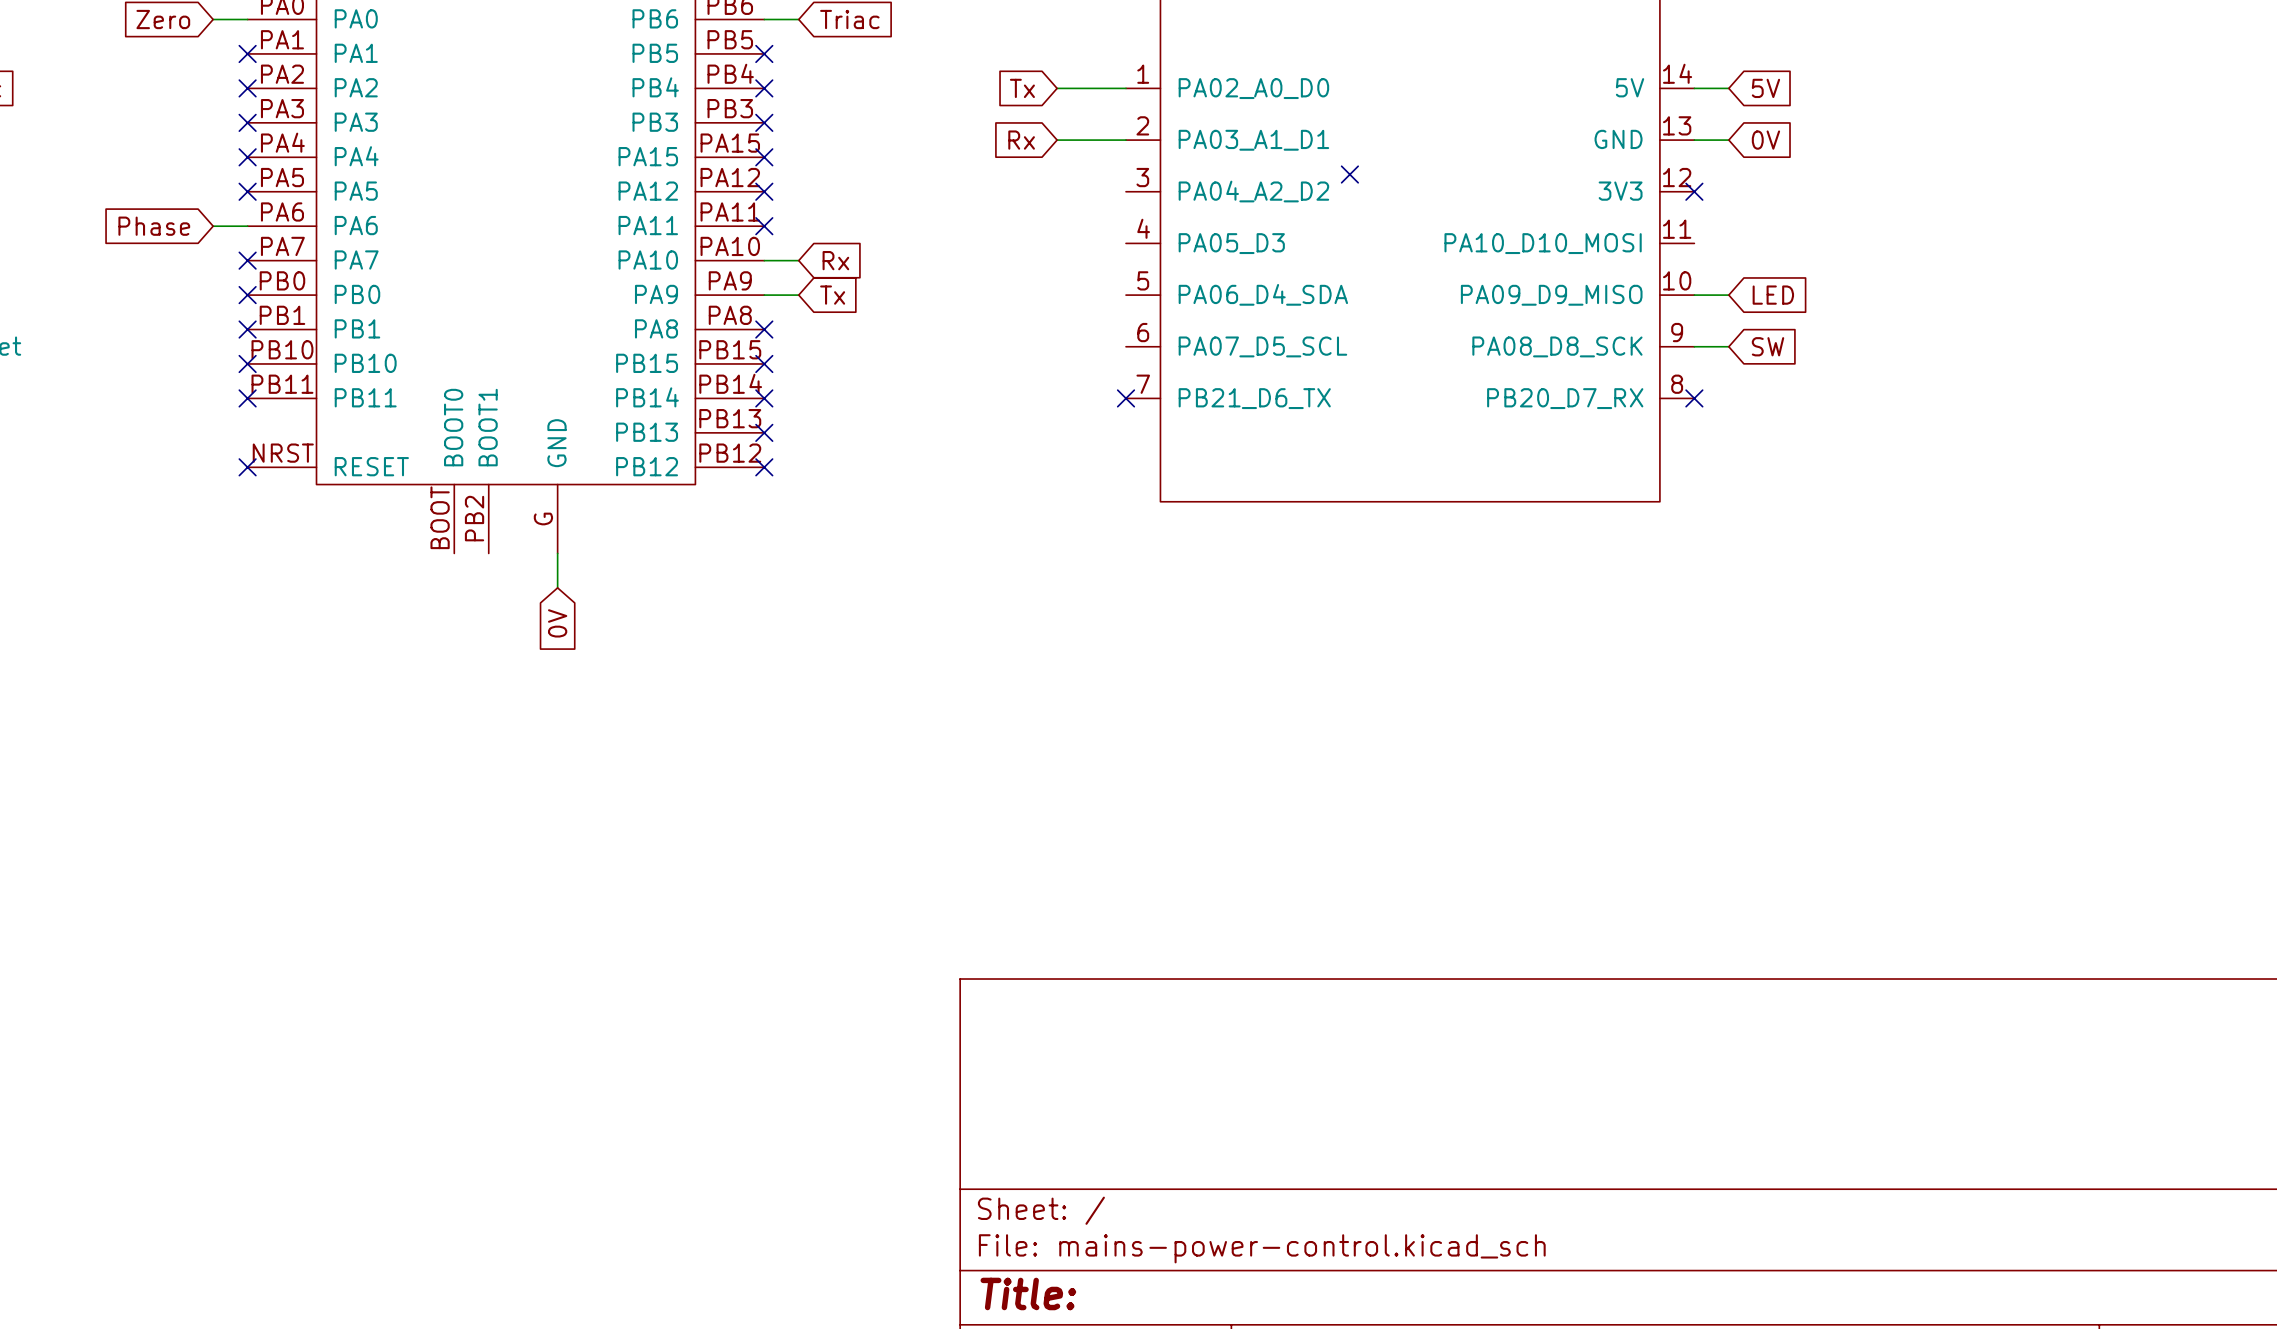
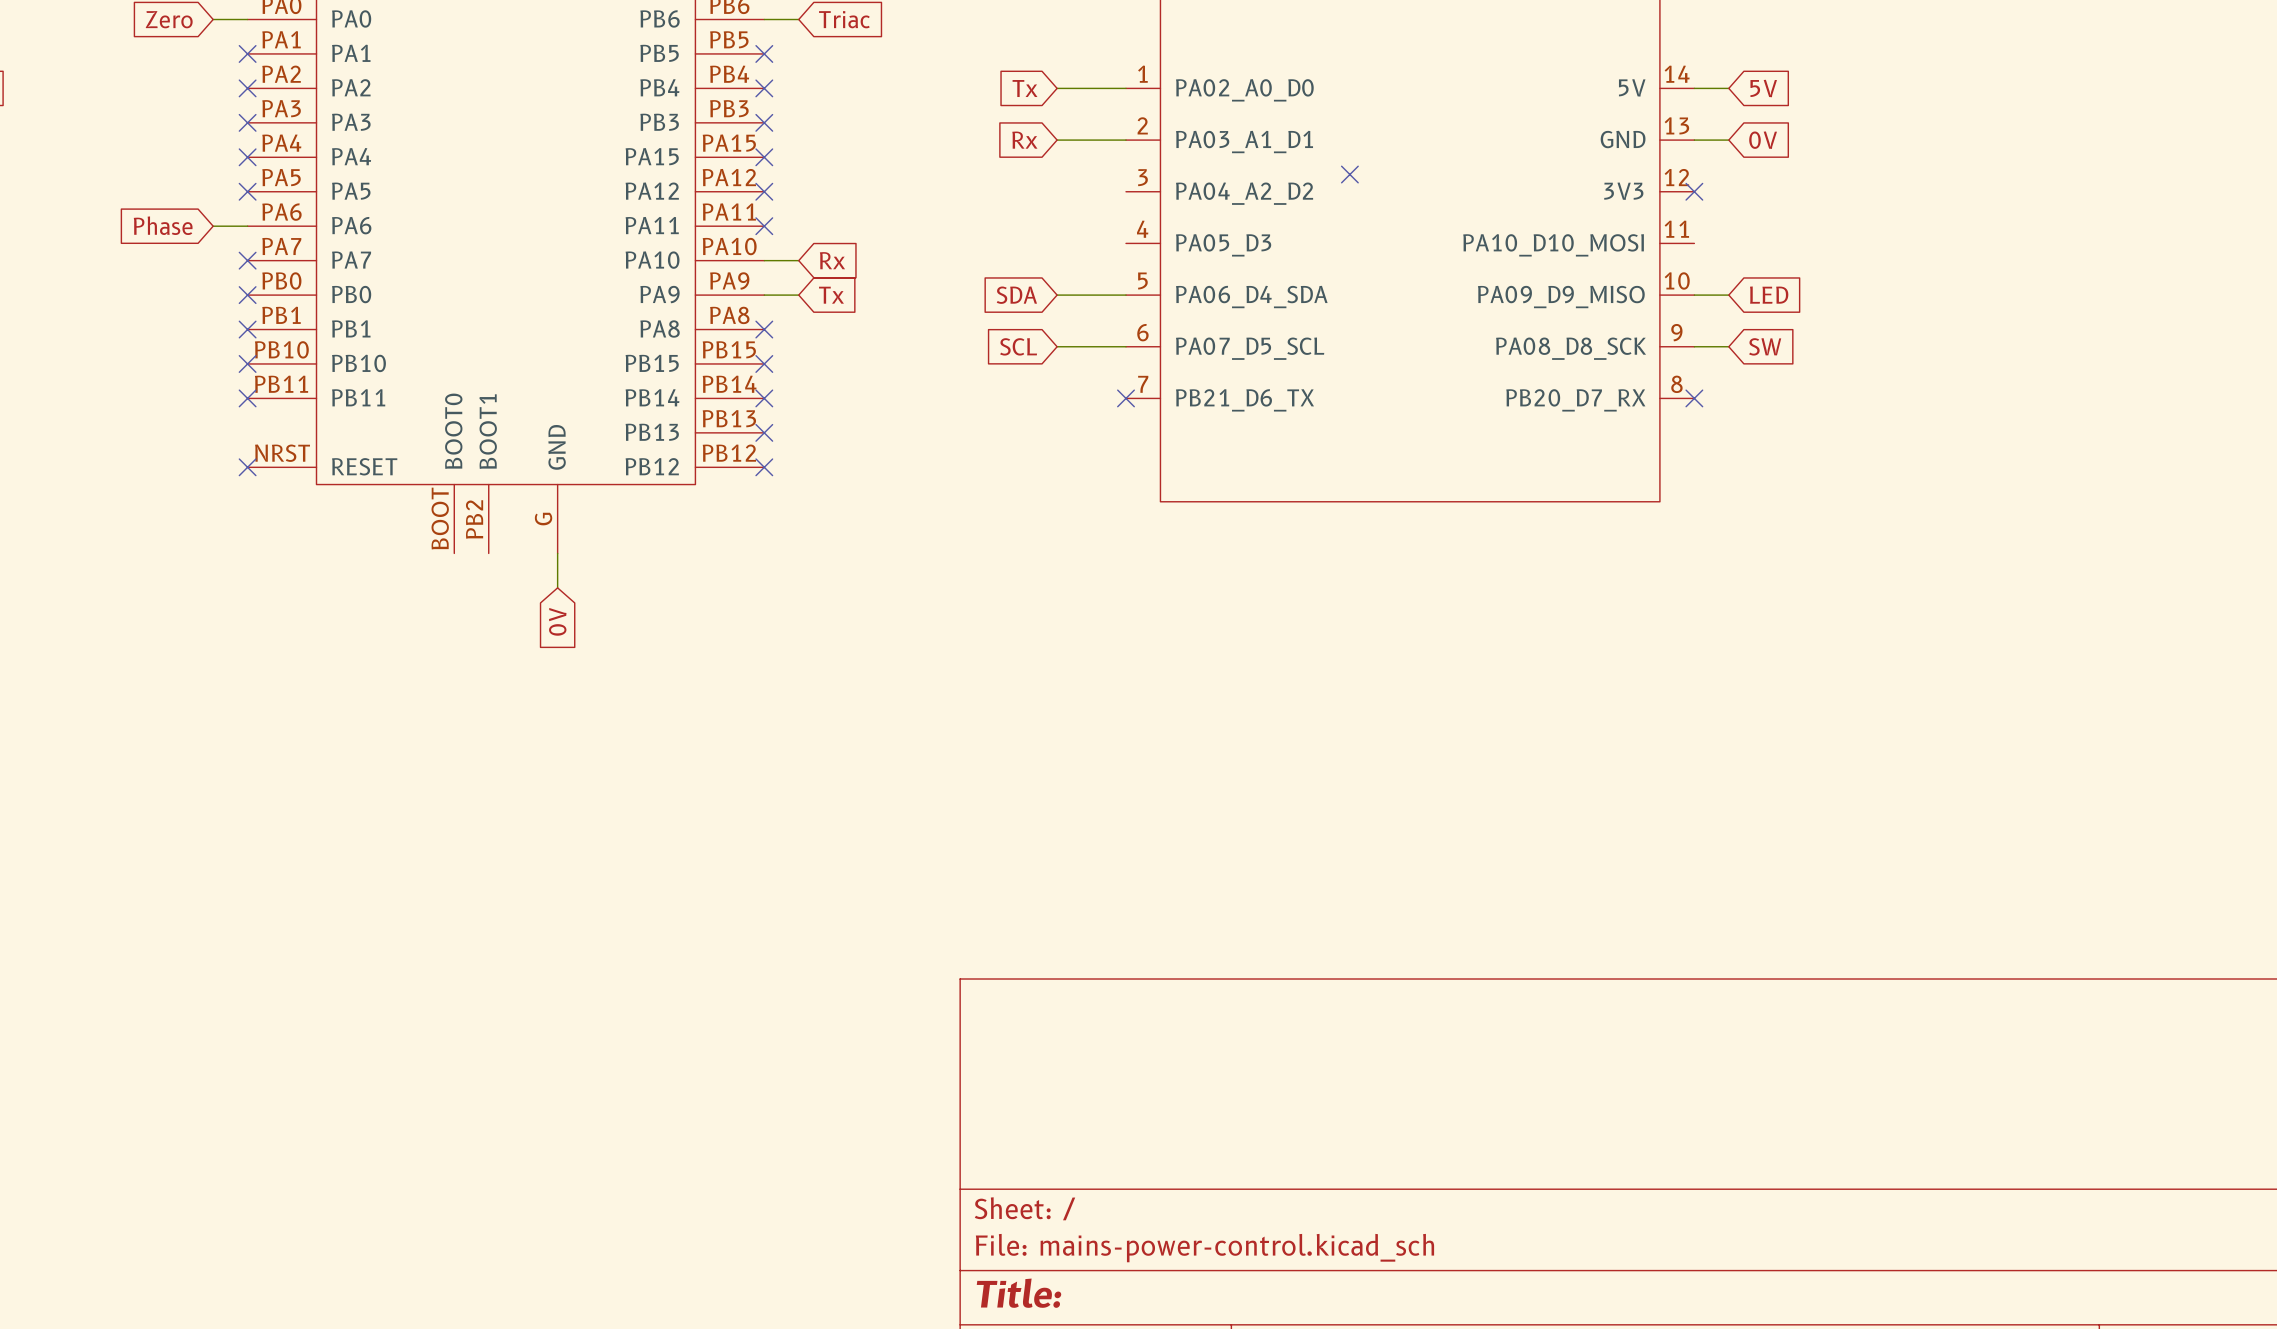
global label: none -> SDA (1016, 295)
wire: none -> (1057, 295) (1126, 295)
global label: none -> SCL (1018, 346)
wire: none -> (1057, 346) (1126, 346)

